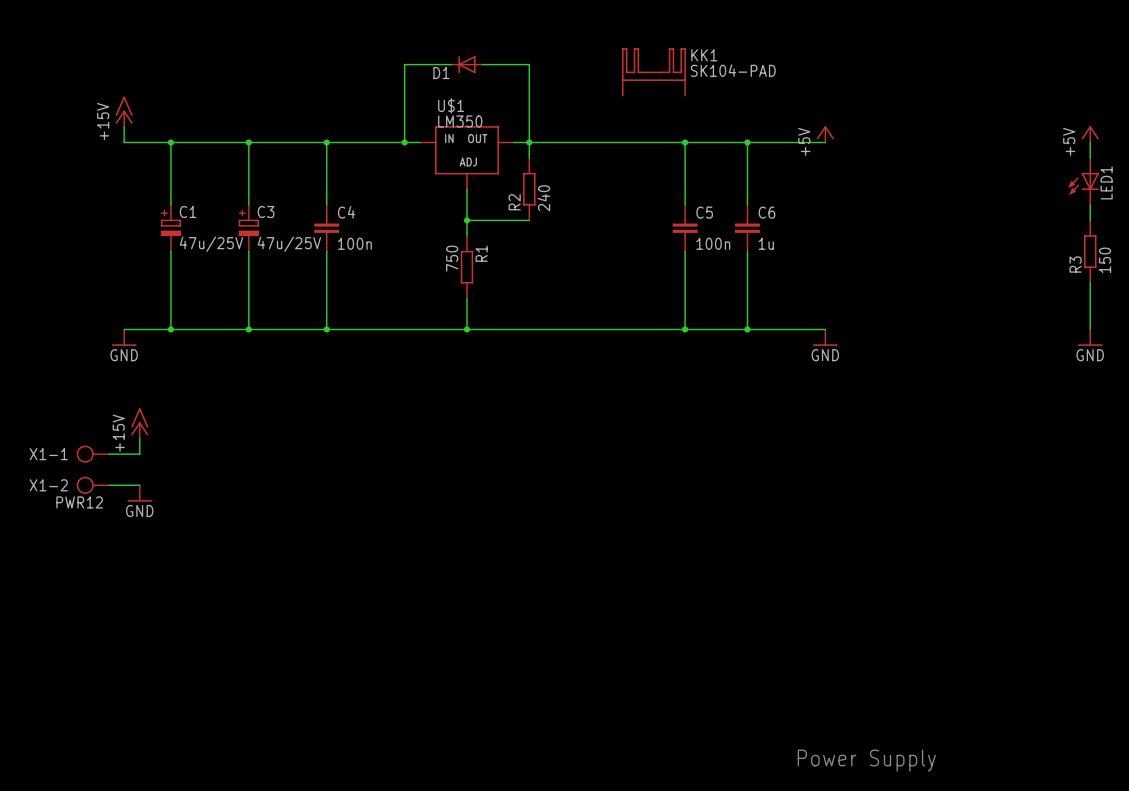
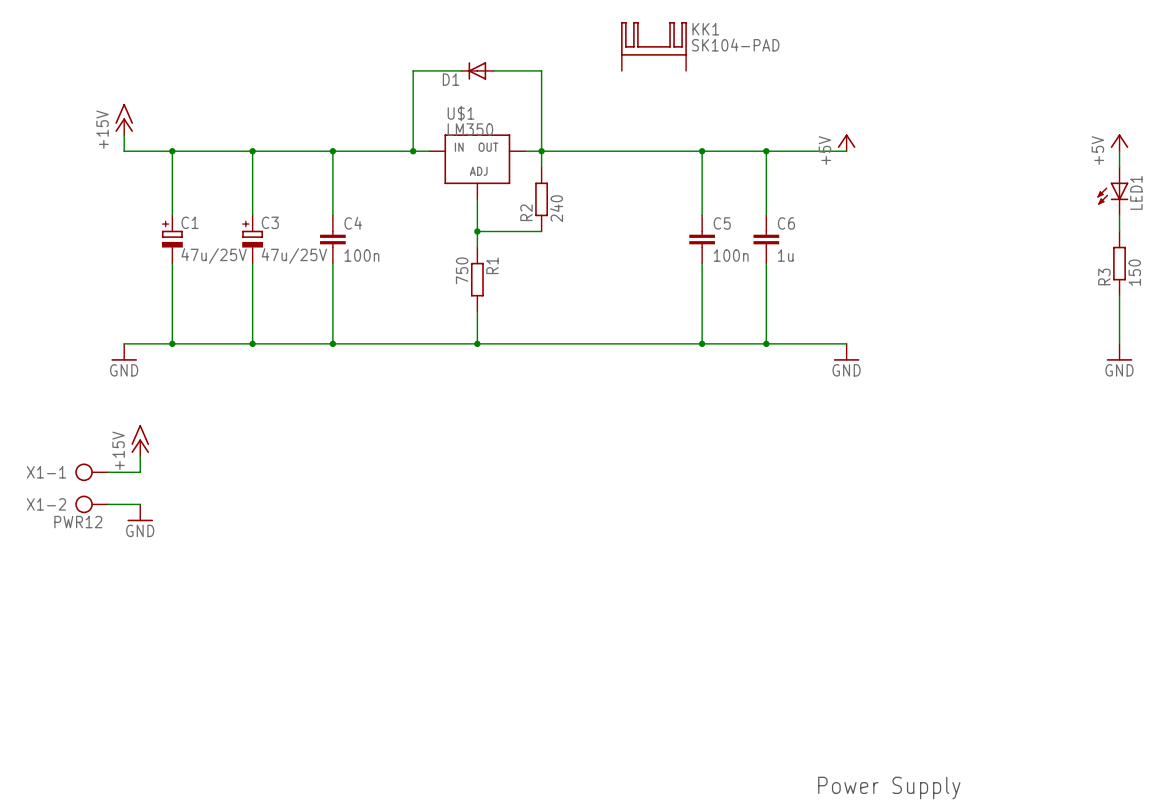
KK1 position: (653, 72) -> (653, 46)

